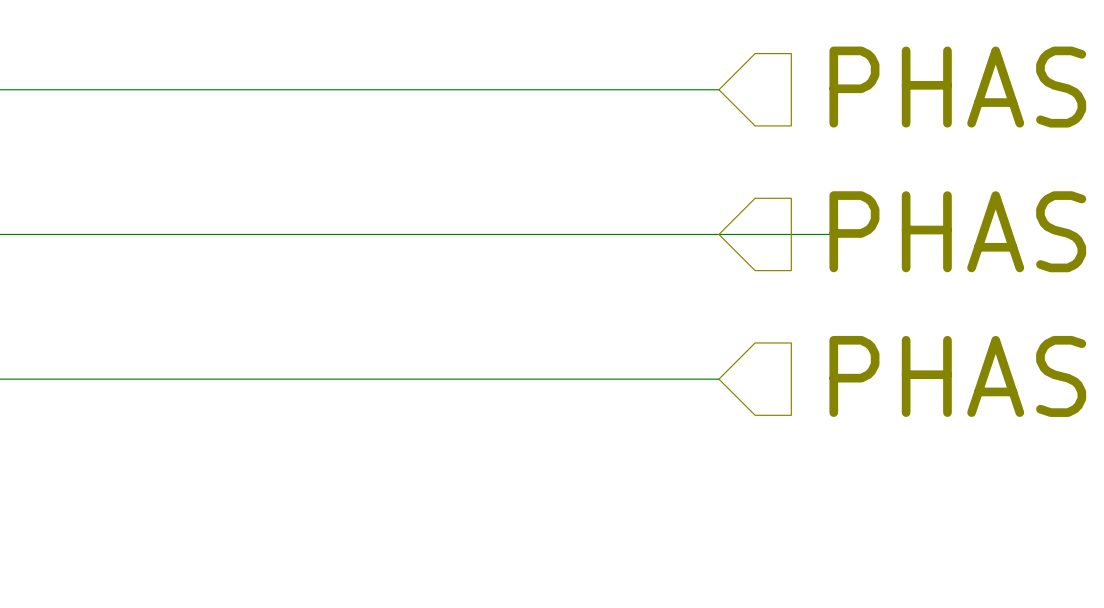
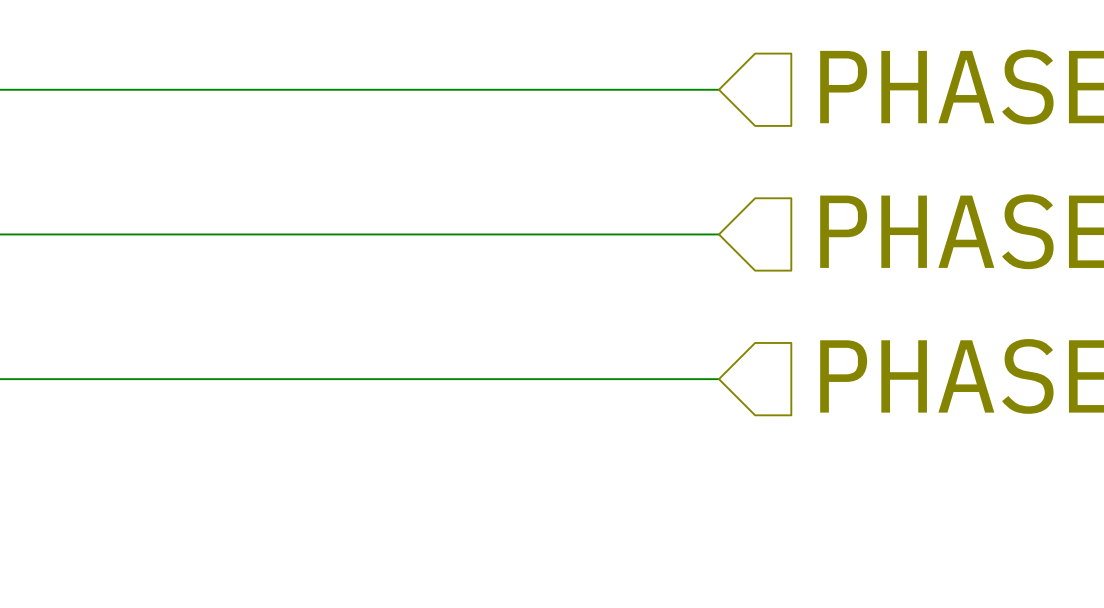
wire: (718, 234) (863, 234) -> none

